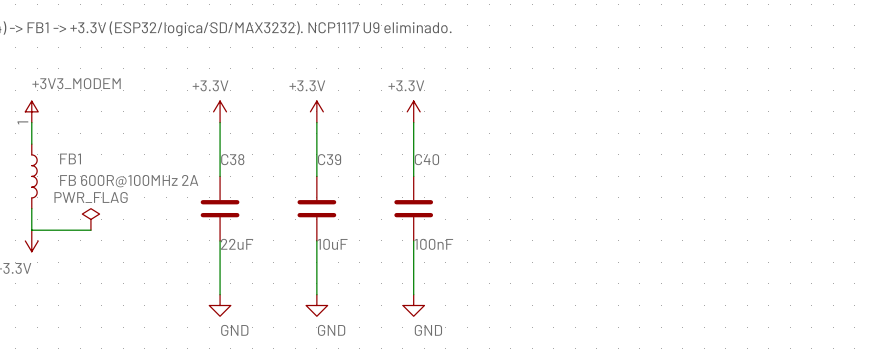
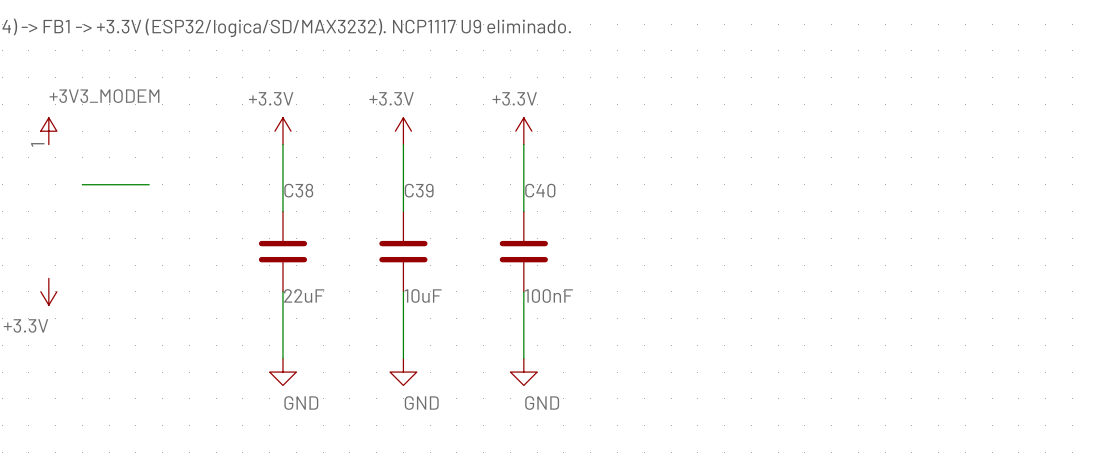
wire: (31, 122) (31, 144) -> none
wire: none -> (82, 184) (149, 184)
FB1: FB 600R@100MHz 2A (34, 176) -> none
wire: (31, 208) (31, 230) (90, 230) -> none
power symbol: PWR_FLAG (90, 219) -> none

